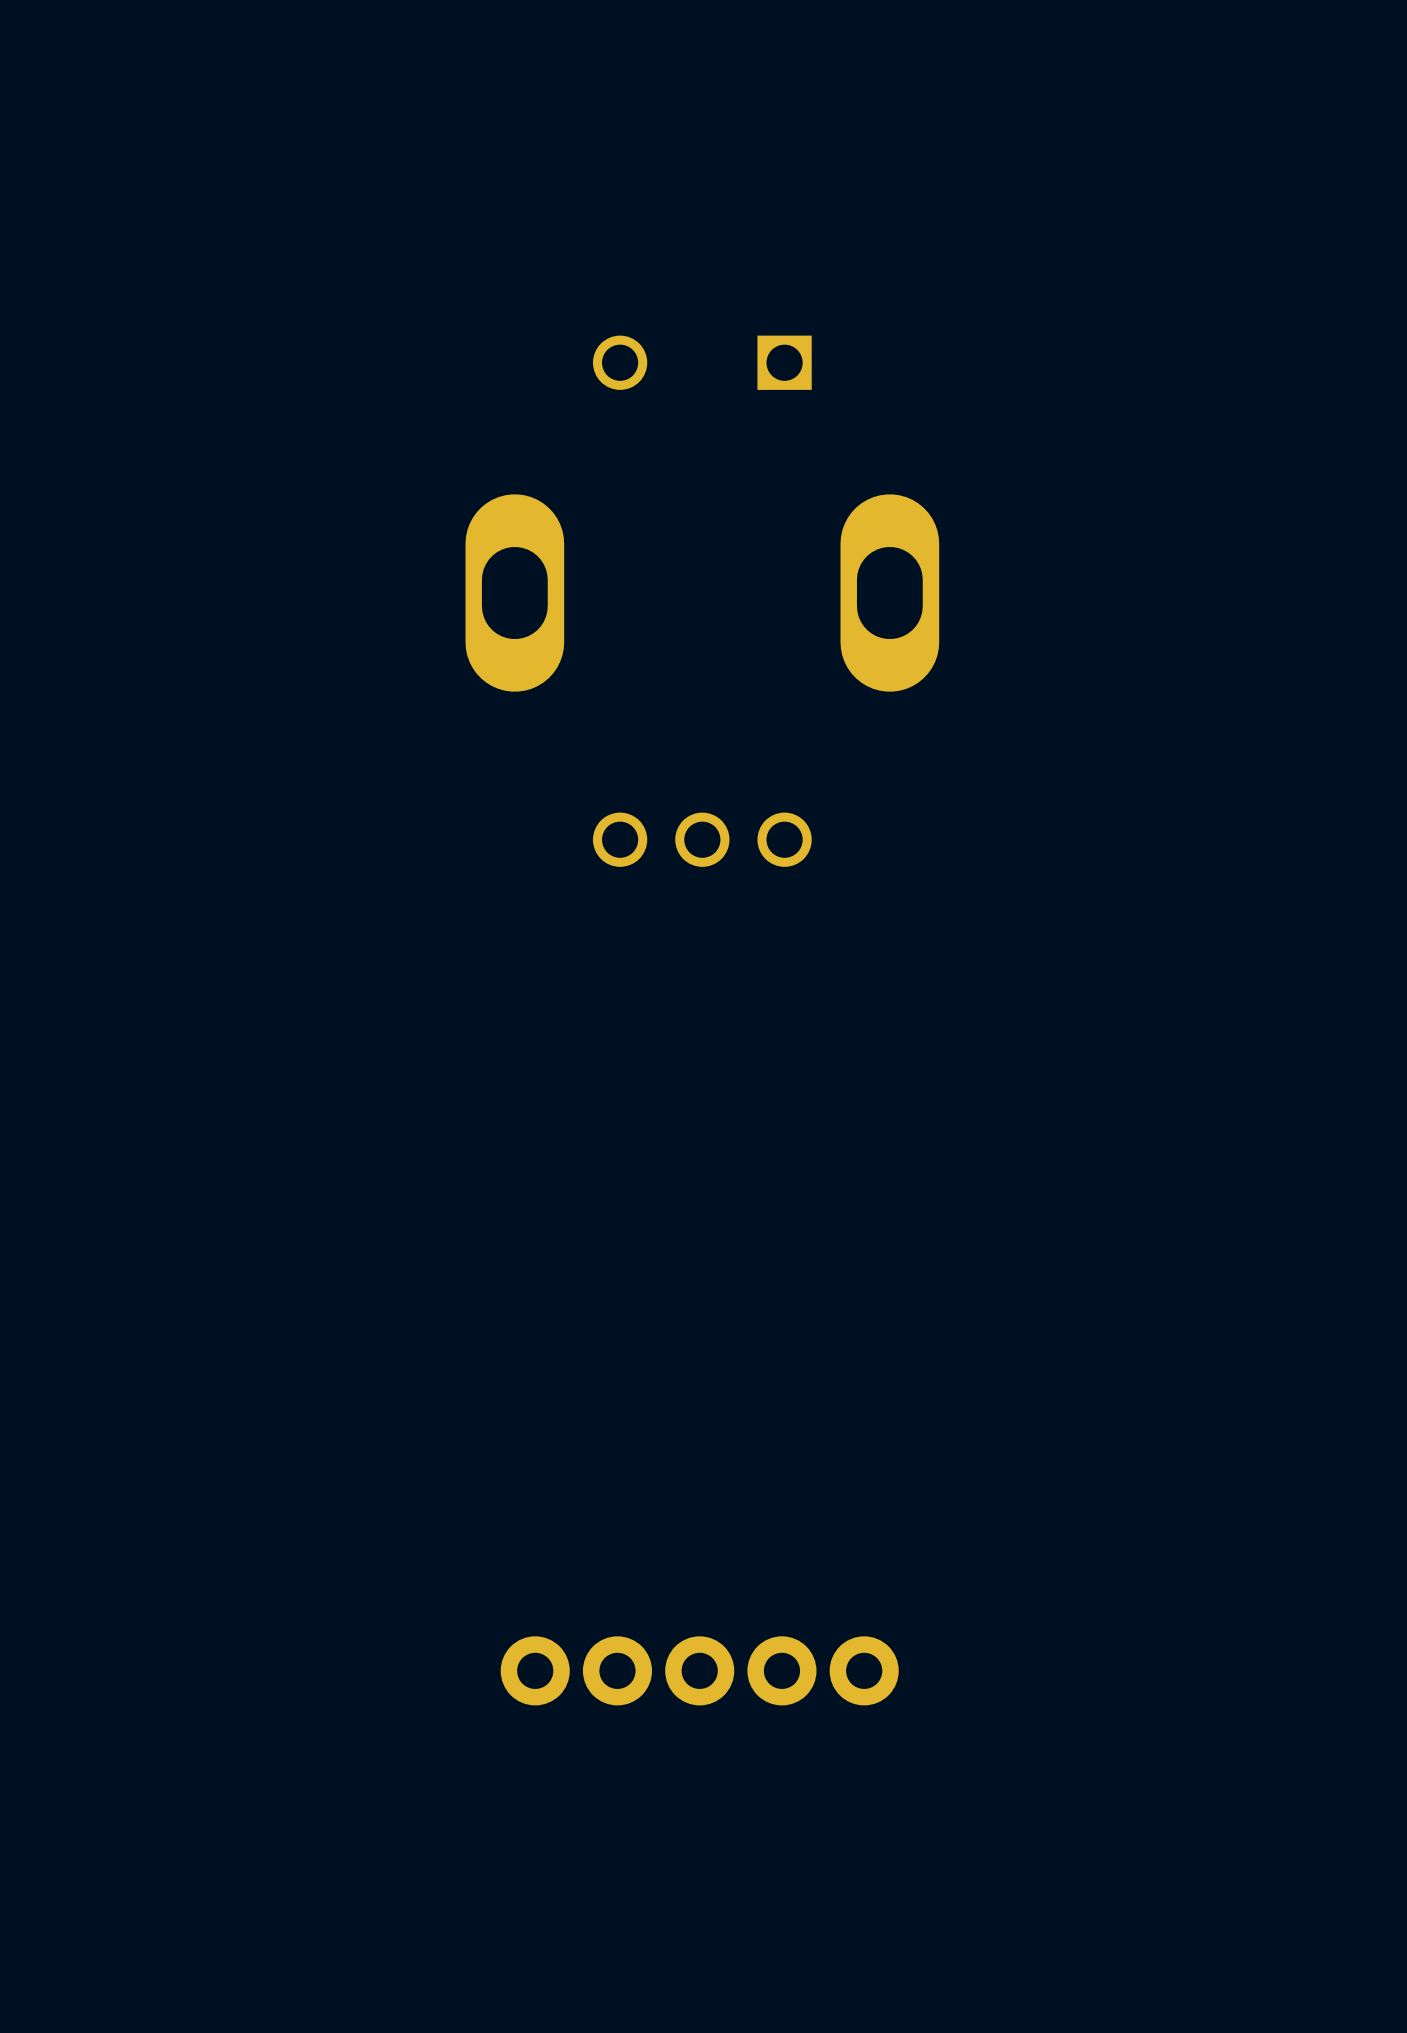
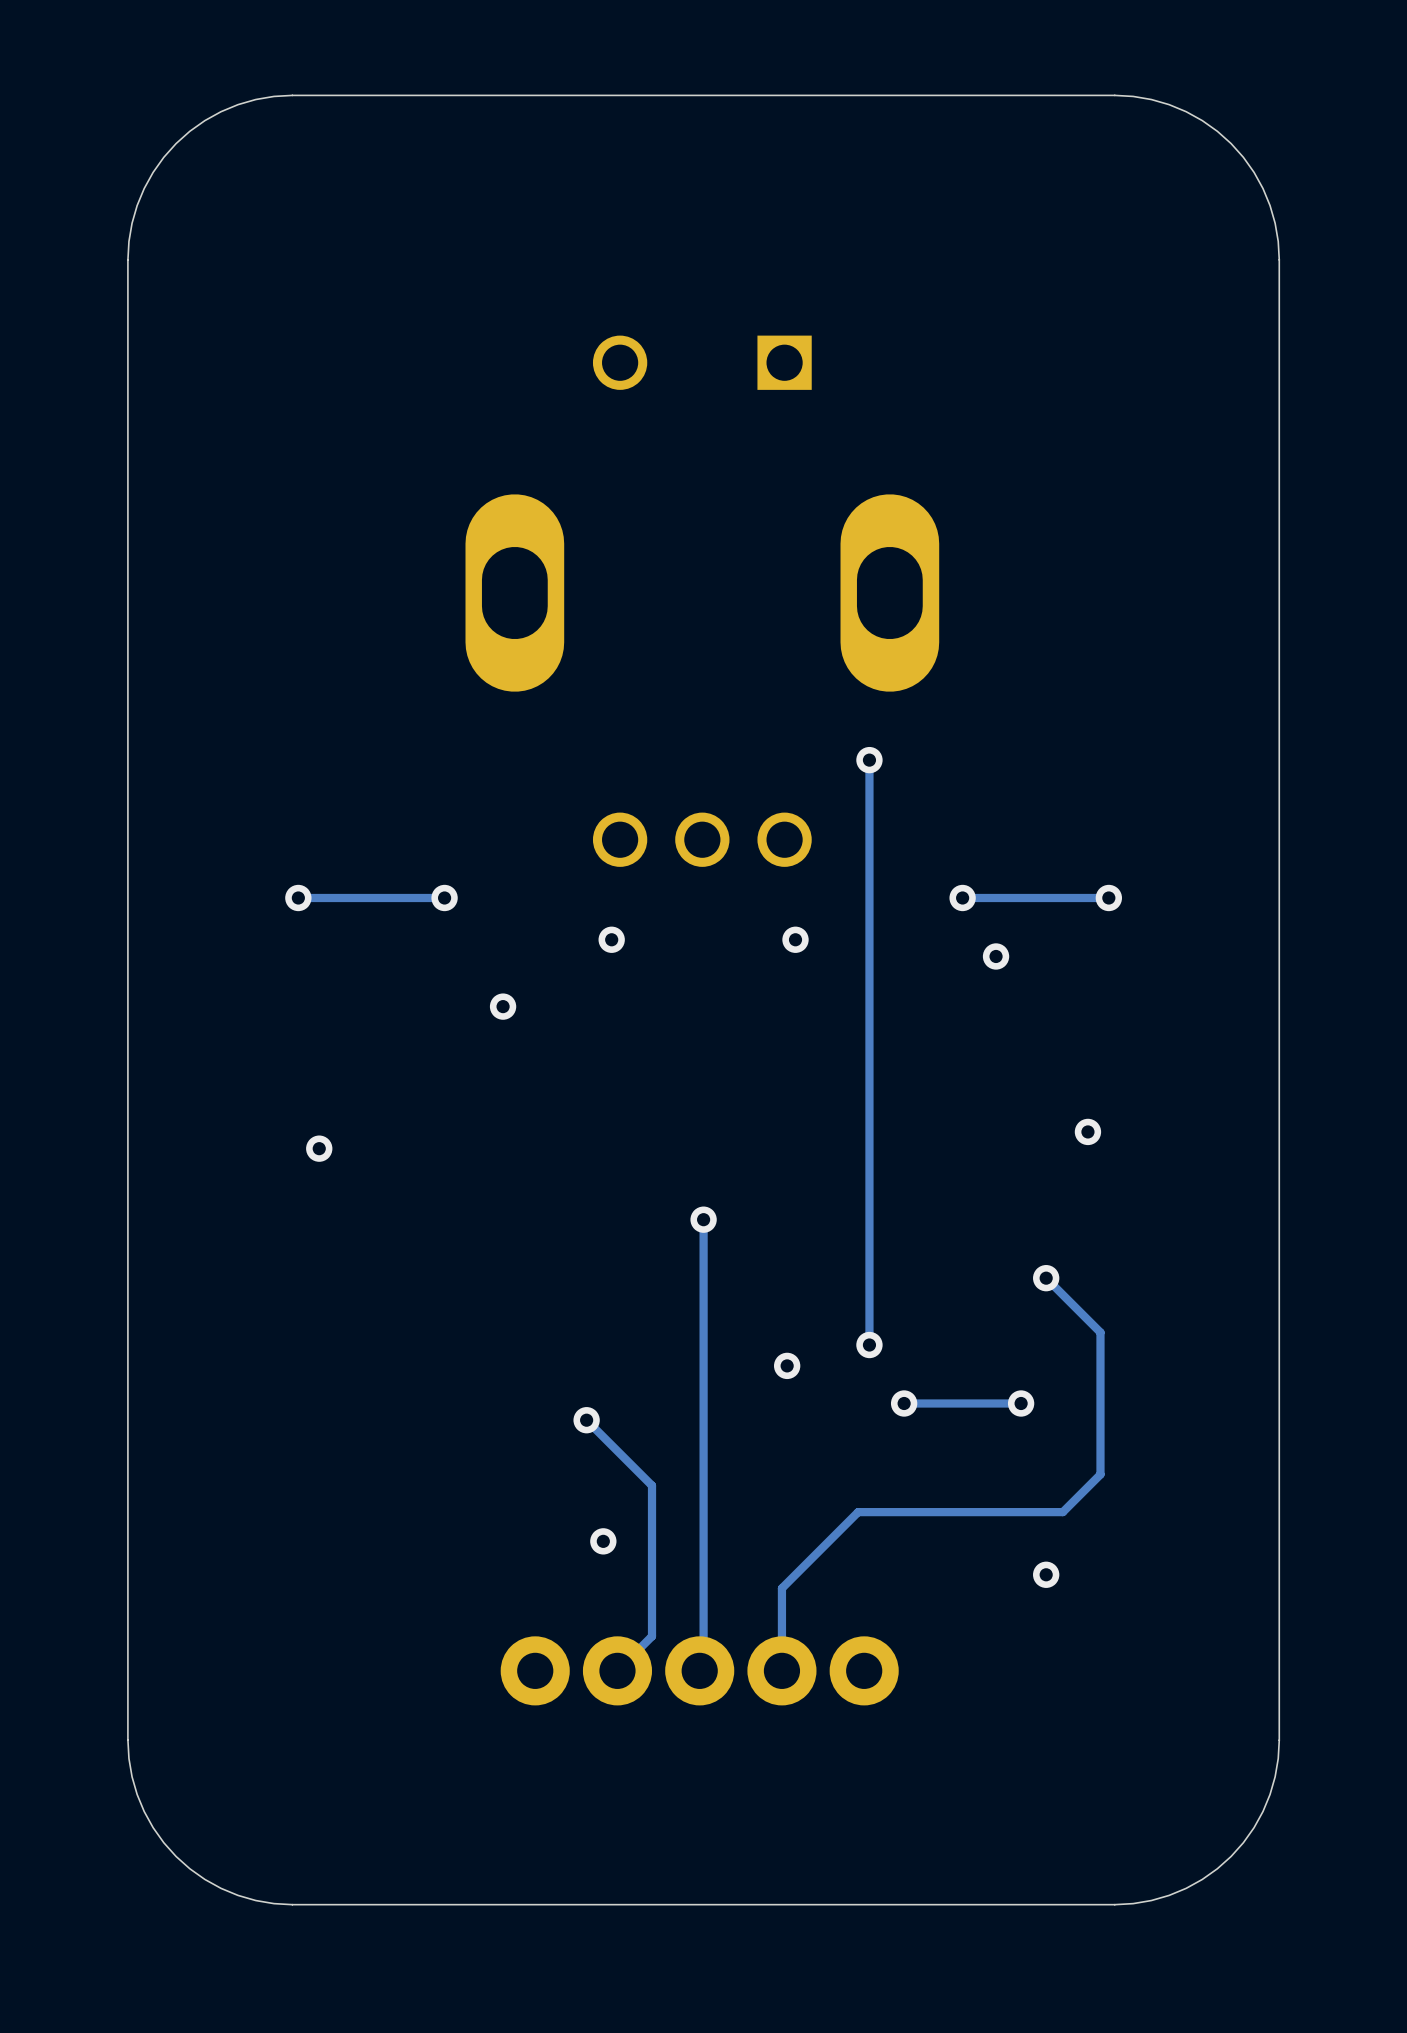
board edge: none -> (1114, 95) (273, 96) (238, 104) (204, 120) (189, 131) (163, 157) (144, 188) (132, 223) (127, 259) (127, 1740) (128, 1758) (137, 1794) (153, 1827) (163, 1842) (189, 1868) (221, 1888) (255, 1900) (292, 1904) (1133, 1903) (1169, 1895) (1202, 1879) (1217, 1868) (1243, 1842) (1262, 1811) (1275, 1776) (1279, 1740) (1278, 241) (1270, 205) (1254, 172) (1243, 157) (1217, 131) (1202, 120) (1169, 104) (1133, 96) (1114, 95)
track: none -> (869, 760) (869, 1345)
via: none -> (869, 760)
via: none -> (298, 897)
track: none -> (444, 897) (298, 897)
via: none -> (444, 897)
via: none -> (962, 897)
track: none -> (1108, 897) (962, 897)
via: none -> (1108, 897)
via: none -> (611, 939)
via: none -> (795, 939)
via: none -> (996, 956)
via: none -> (503, 1006)
via: none -> (1087, 1131)
via: none -> (319, 1148)
track: none -> (703, 1219) (703, 1666) (699, 1670)
via: none -> (703, 1219)
track: none -> (1046, 1278) (1100, 1332) (1100, 1474) (1062, 1512) (858, 1512) (781, 1588) (781, 1670)
via: none -> (1046, 1278)
via: none -> (869, 1345)
via: none -> (787, 1365)
via: none -> (904, 1403)
track: none -> (1021, 1403) (904, 1403)
via: none -> (1021, 1403)
track: none -> (586, 1420) (652, 1485) (652, 1636) (617, 1670)
via: none -> (586, 1420)
via: none -> (603, 1541)
via: none -> (1046, 1574)

